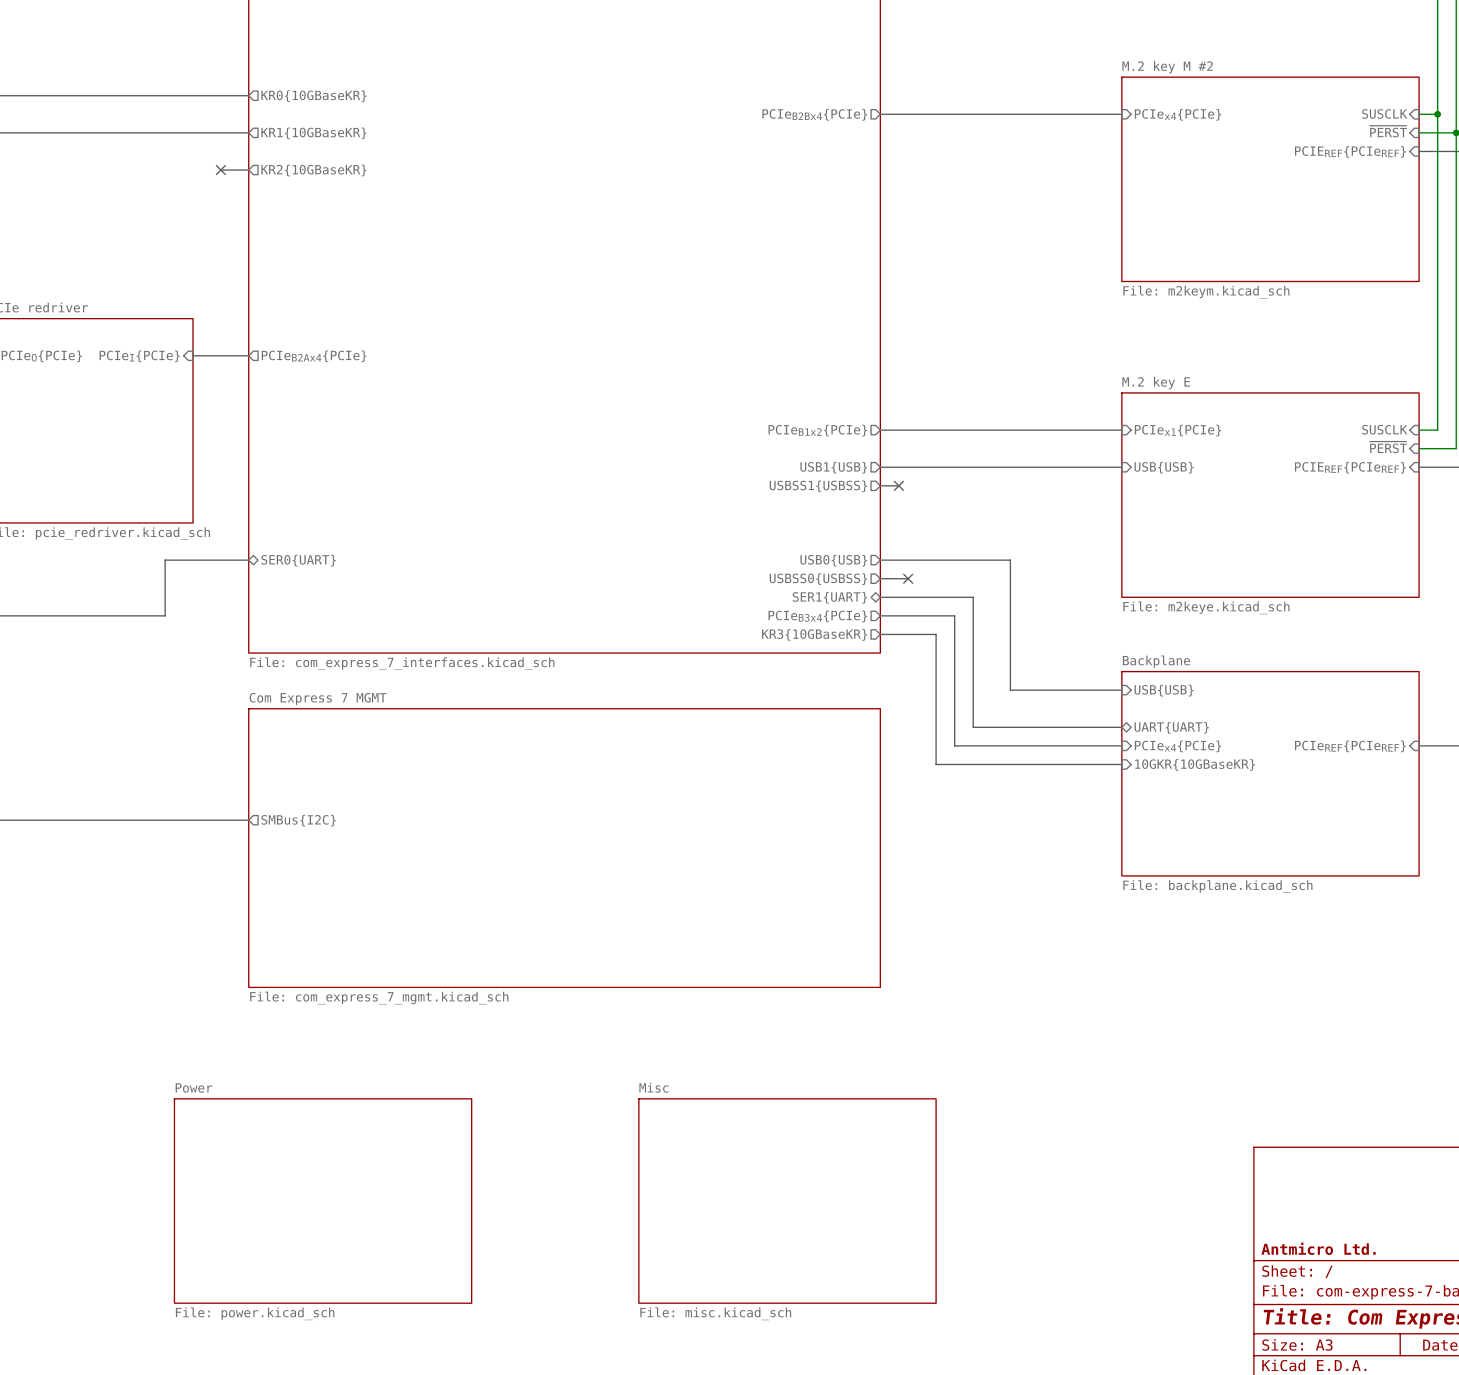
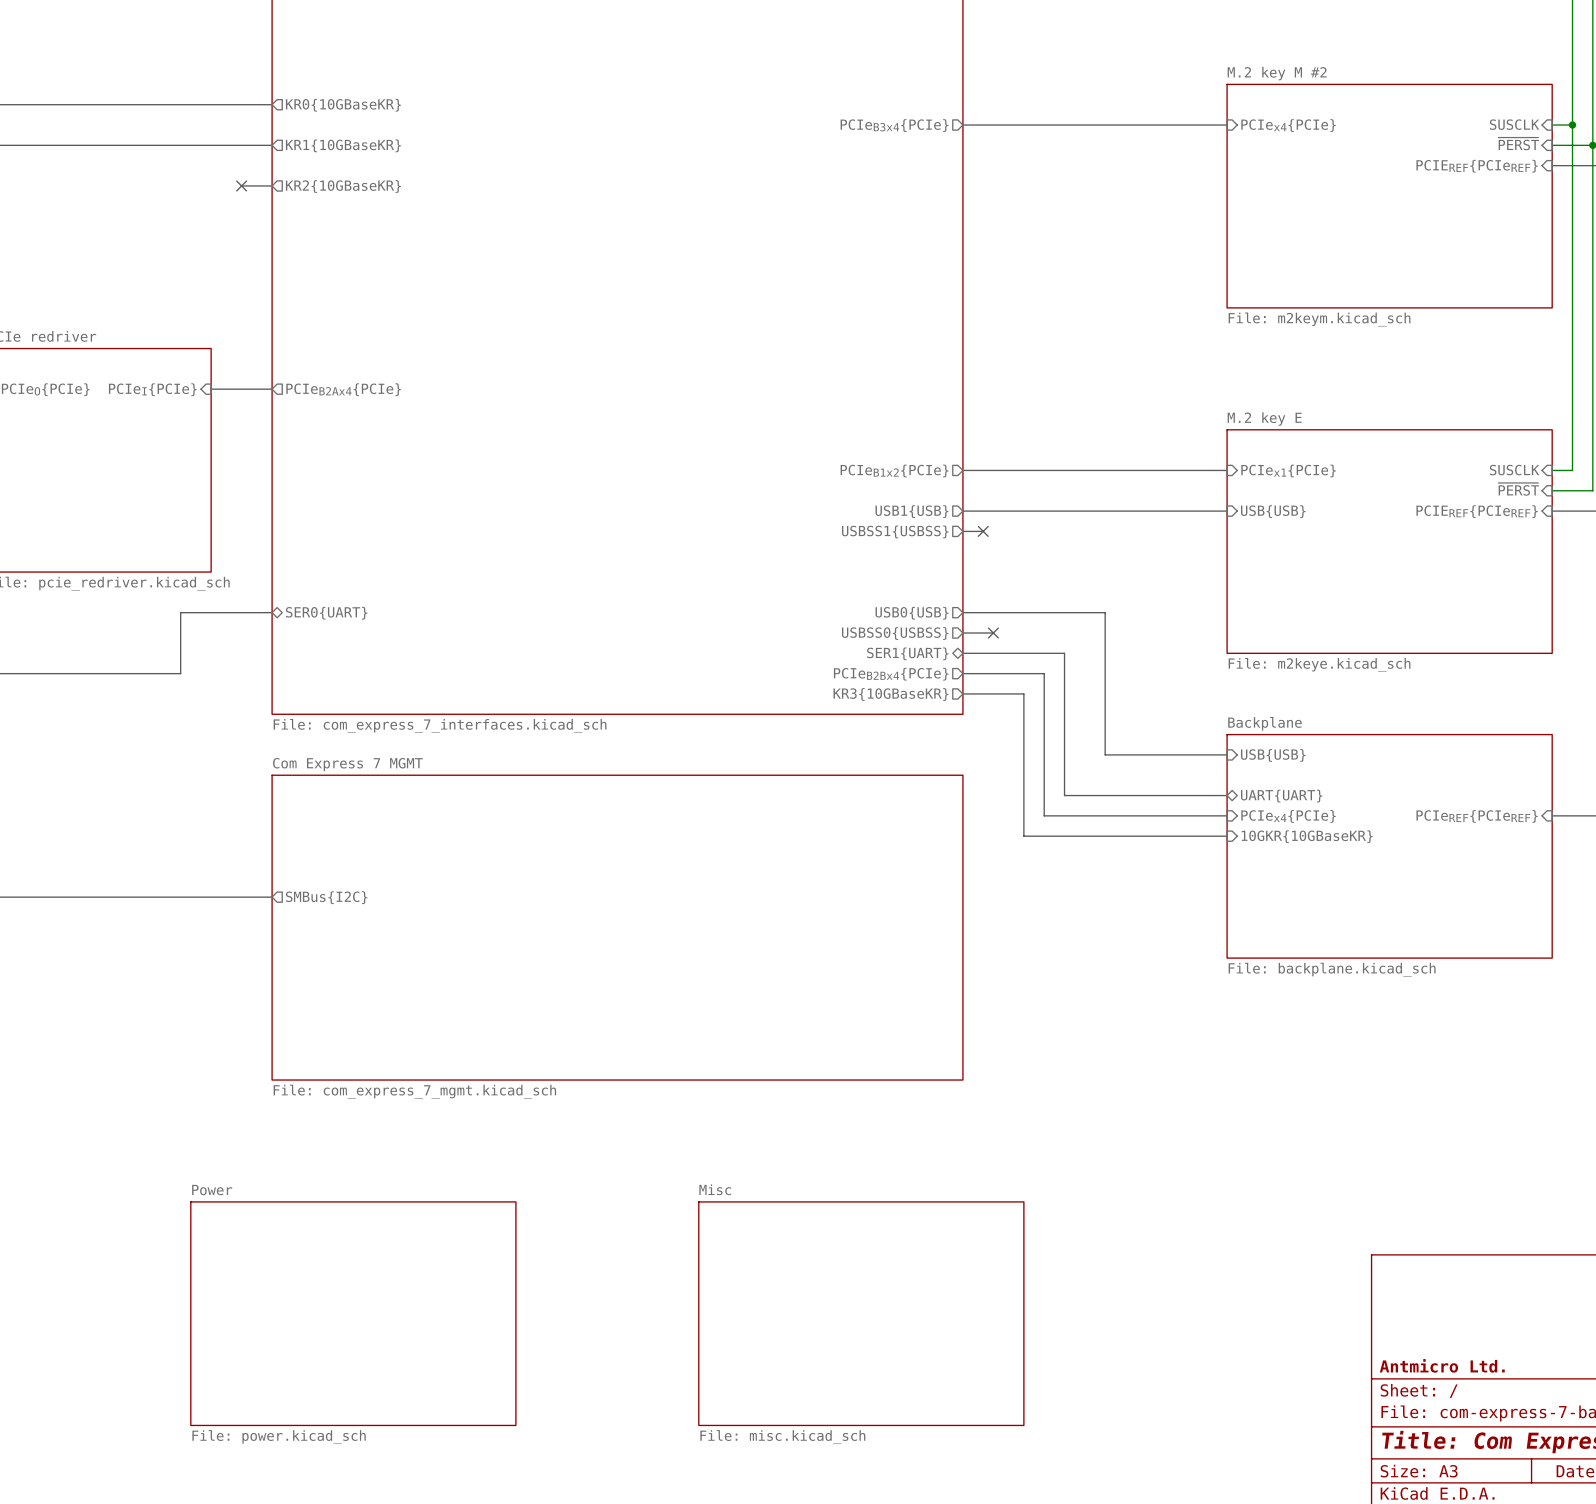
sheet pin: PCIeB2Bx4{PCIe} (814, 114) -> PCIeB3x4{PCIe} (894, 125)
sheet pin: PCIeB3x4{PCIe} (817, 616) -> PCIeB2Bx4{PCIe} (891, 674)

